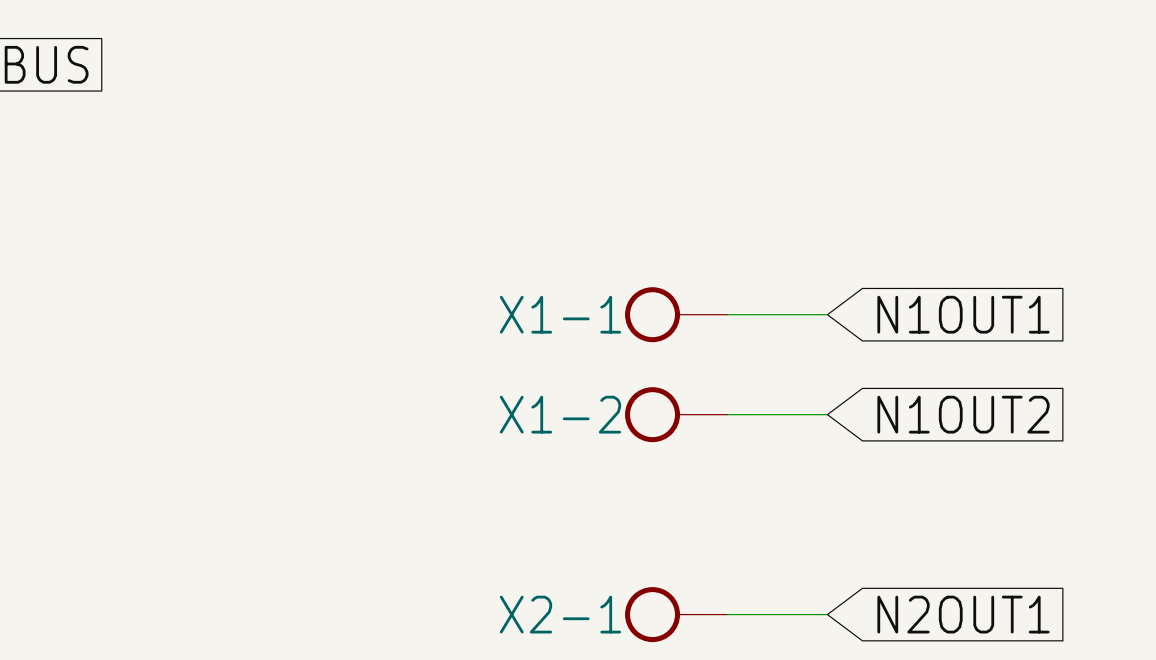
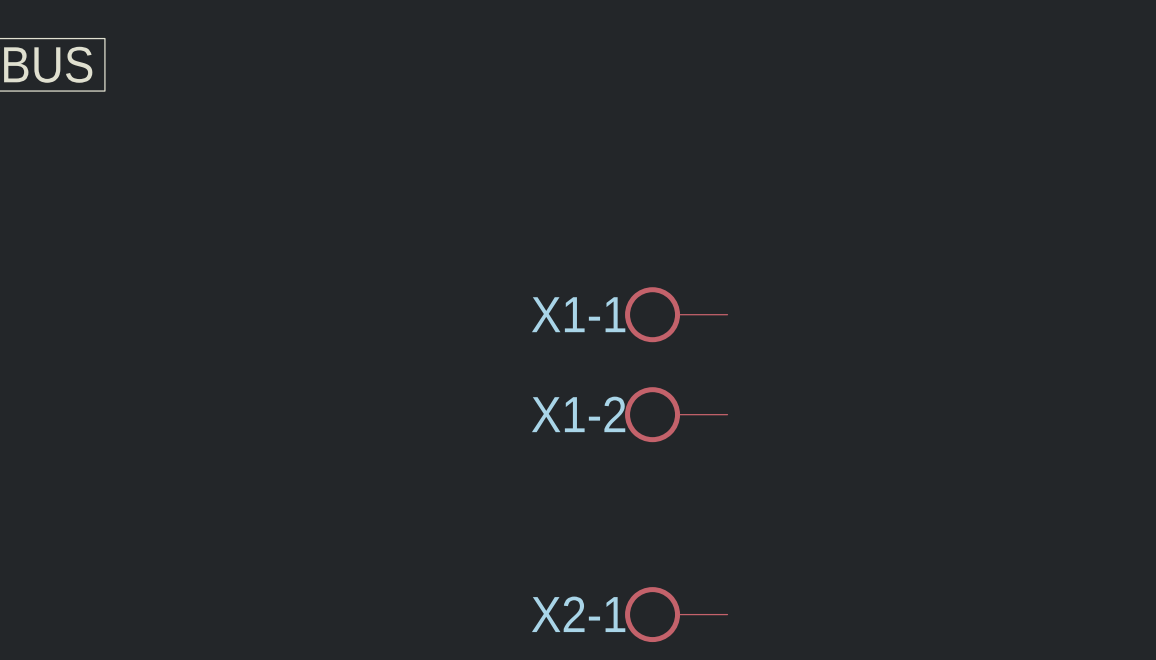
wire: (727, 314) (827, 314) -> none
global label: N1OUT1 (963, 314) -> none
wire: (727, 414) (827, 414) -> none
global label: N1OUT2 (963, 414) -> none
wire: (727, 614) (827, 614) -> none
global label: N2OUT1 (963, 614) -> none

